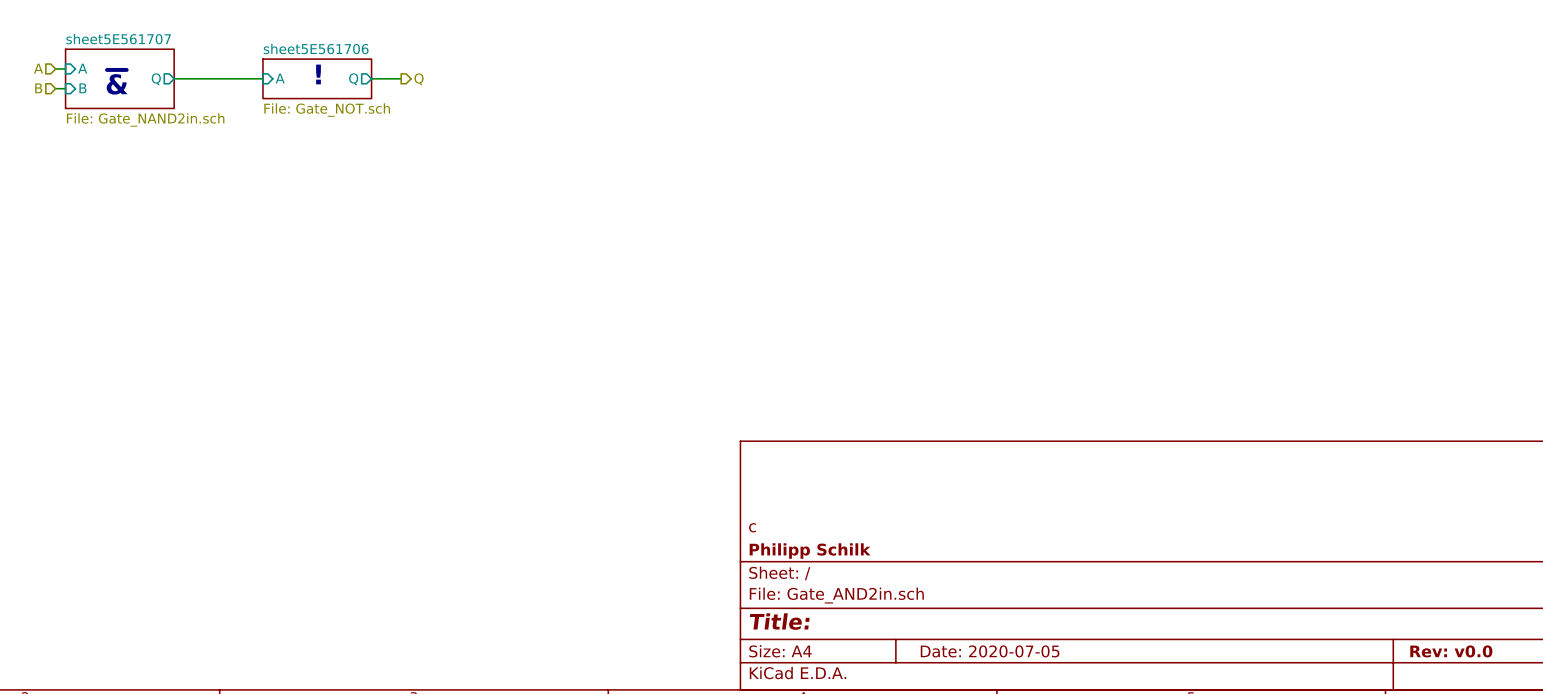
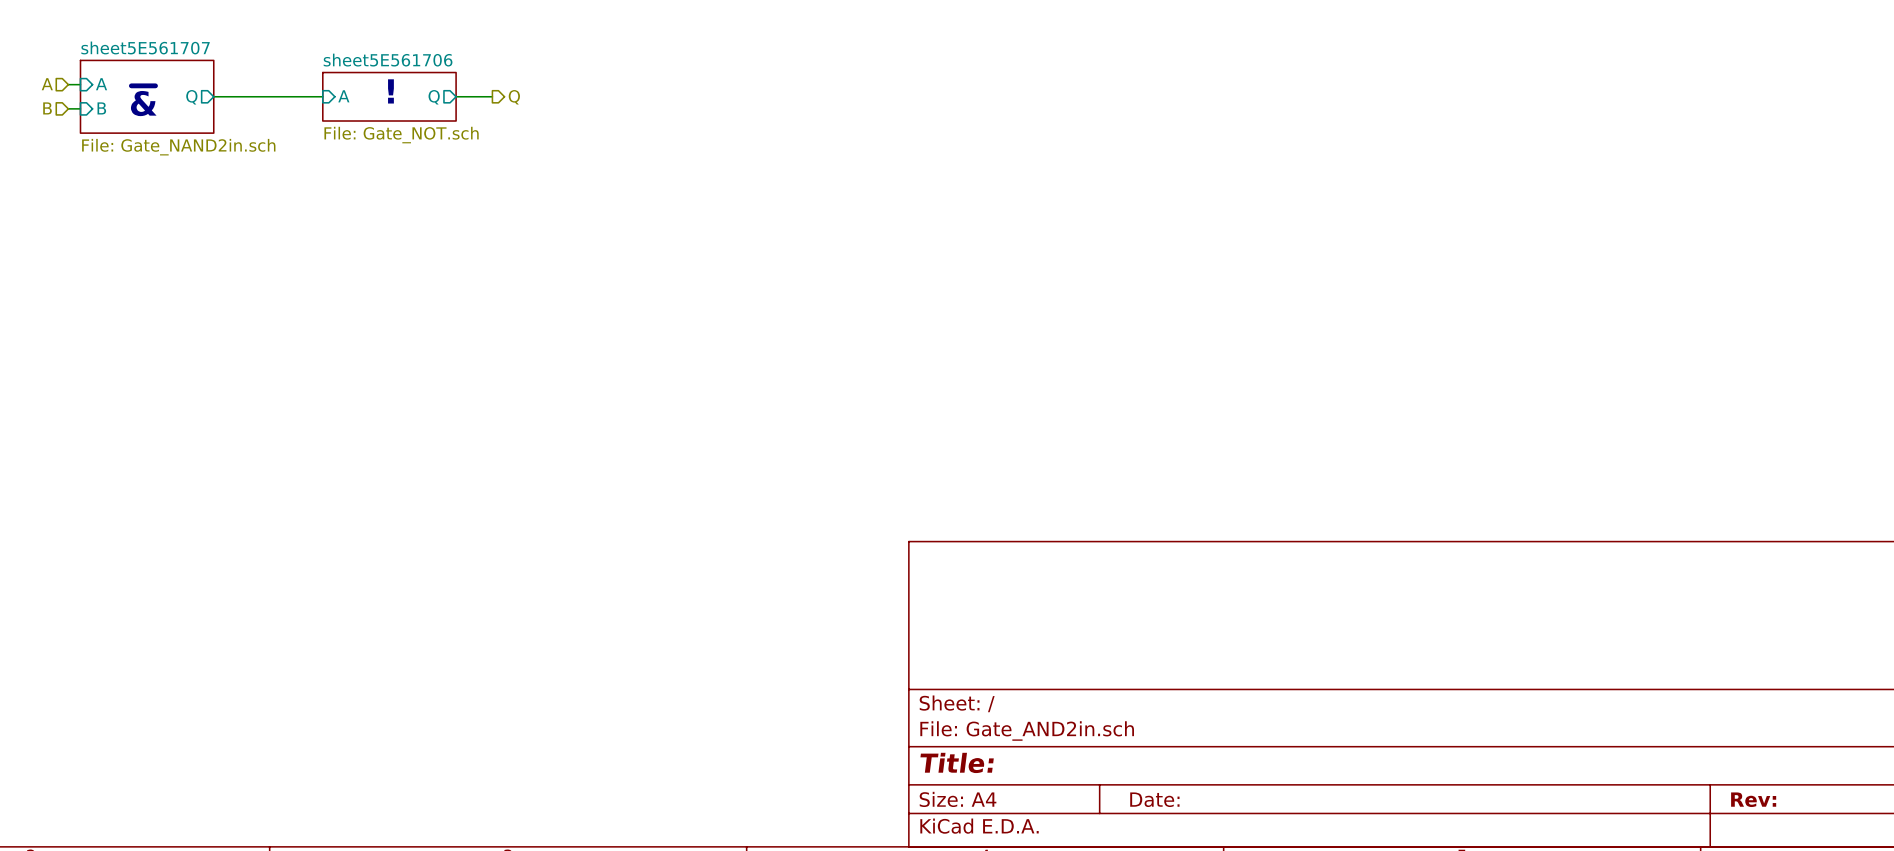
title block: c (752, 527) -> none
title block: Philipp Schilk (810, 551) -> none
title block: Date: 2020-07-05 (990, 651) -> Date: (1154, 799)
title block: Rev: v0.0 (1451, 651) -> Rev: (1753, 799)

